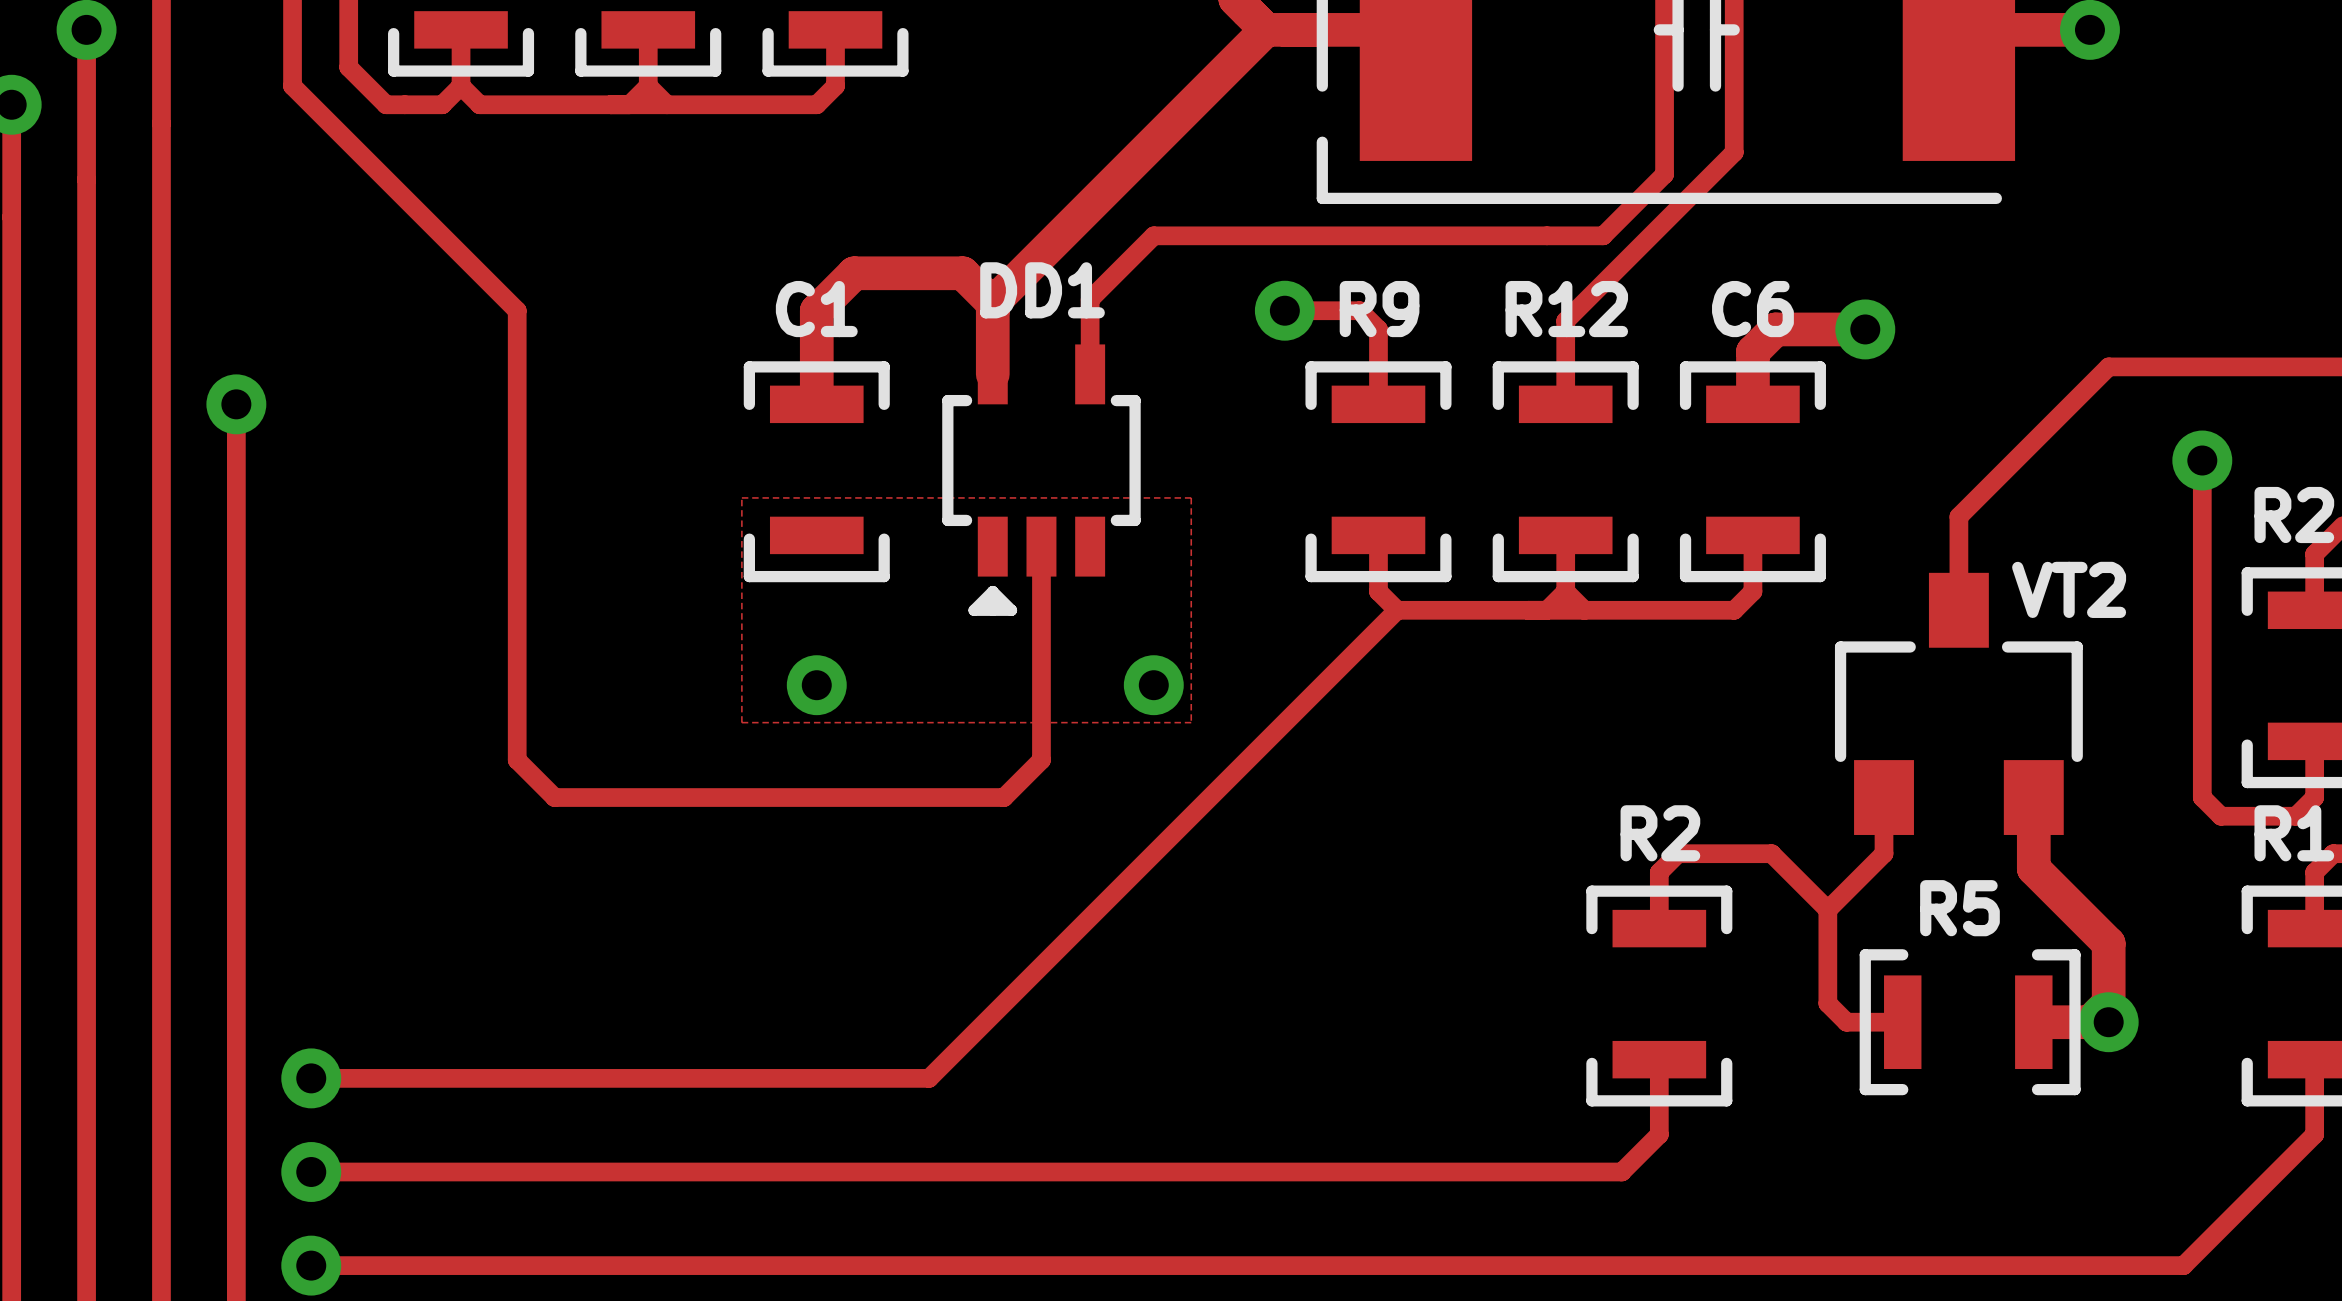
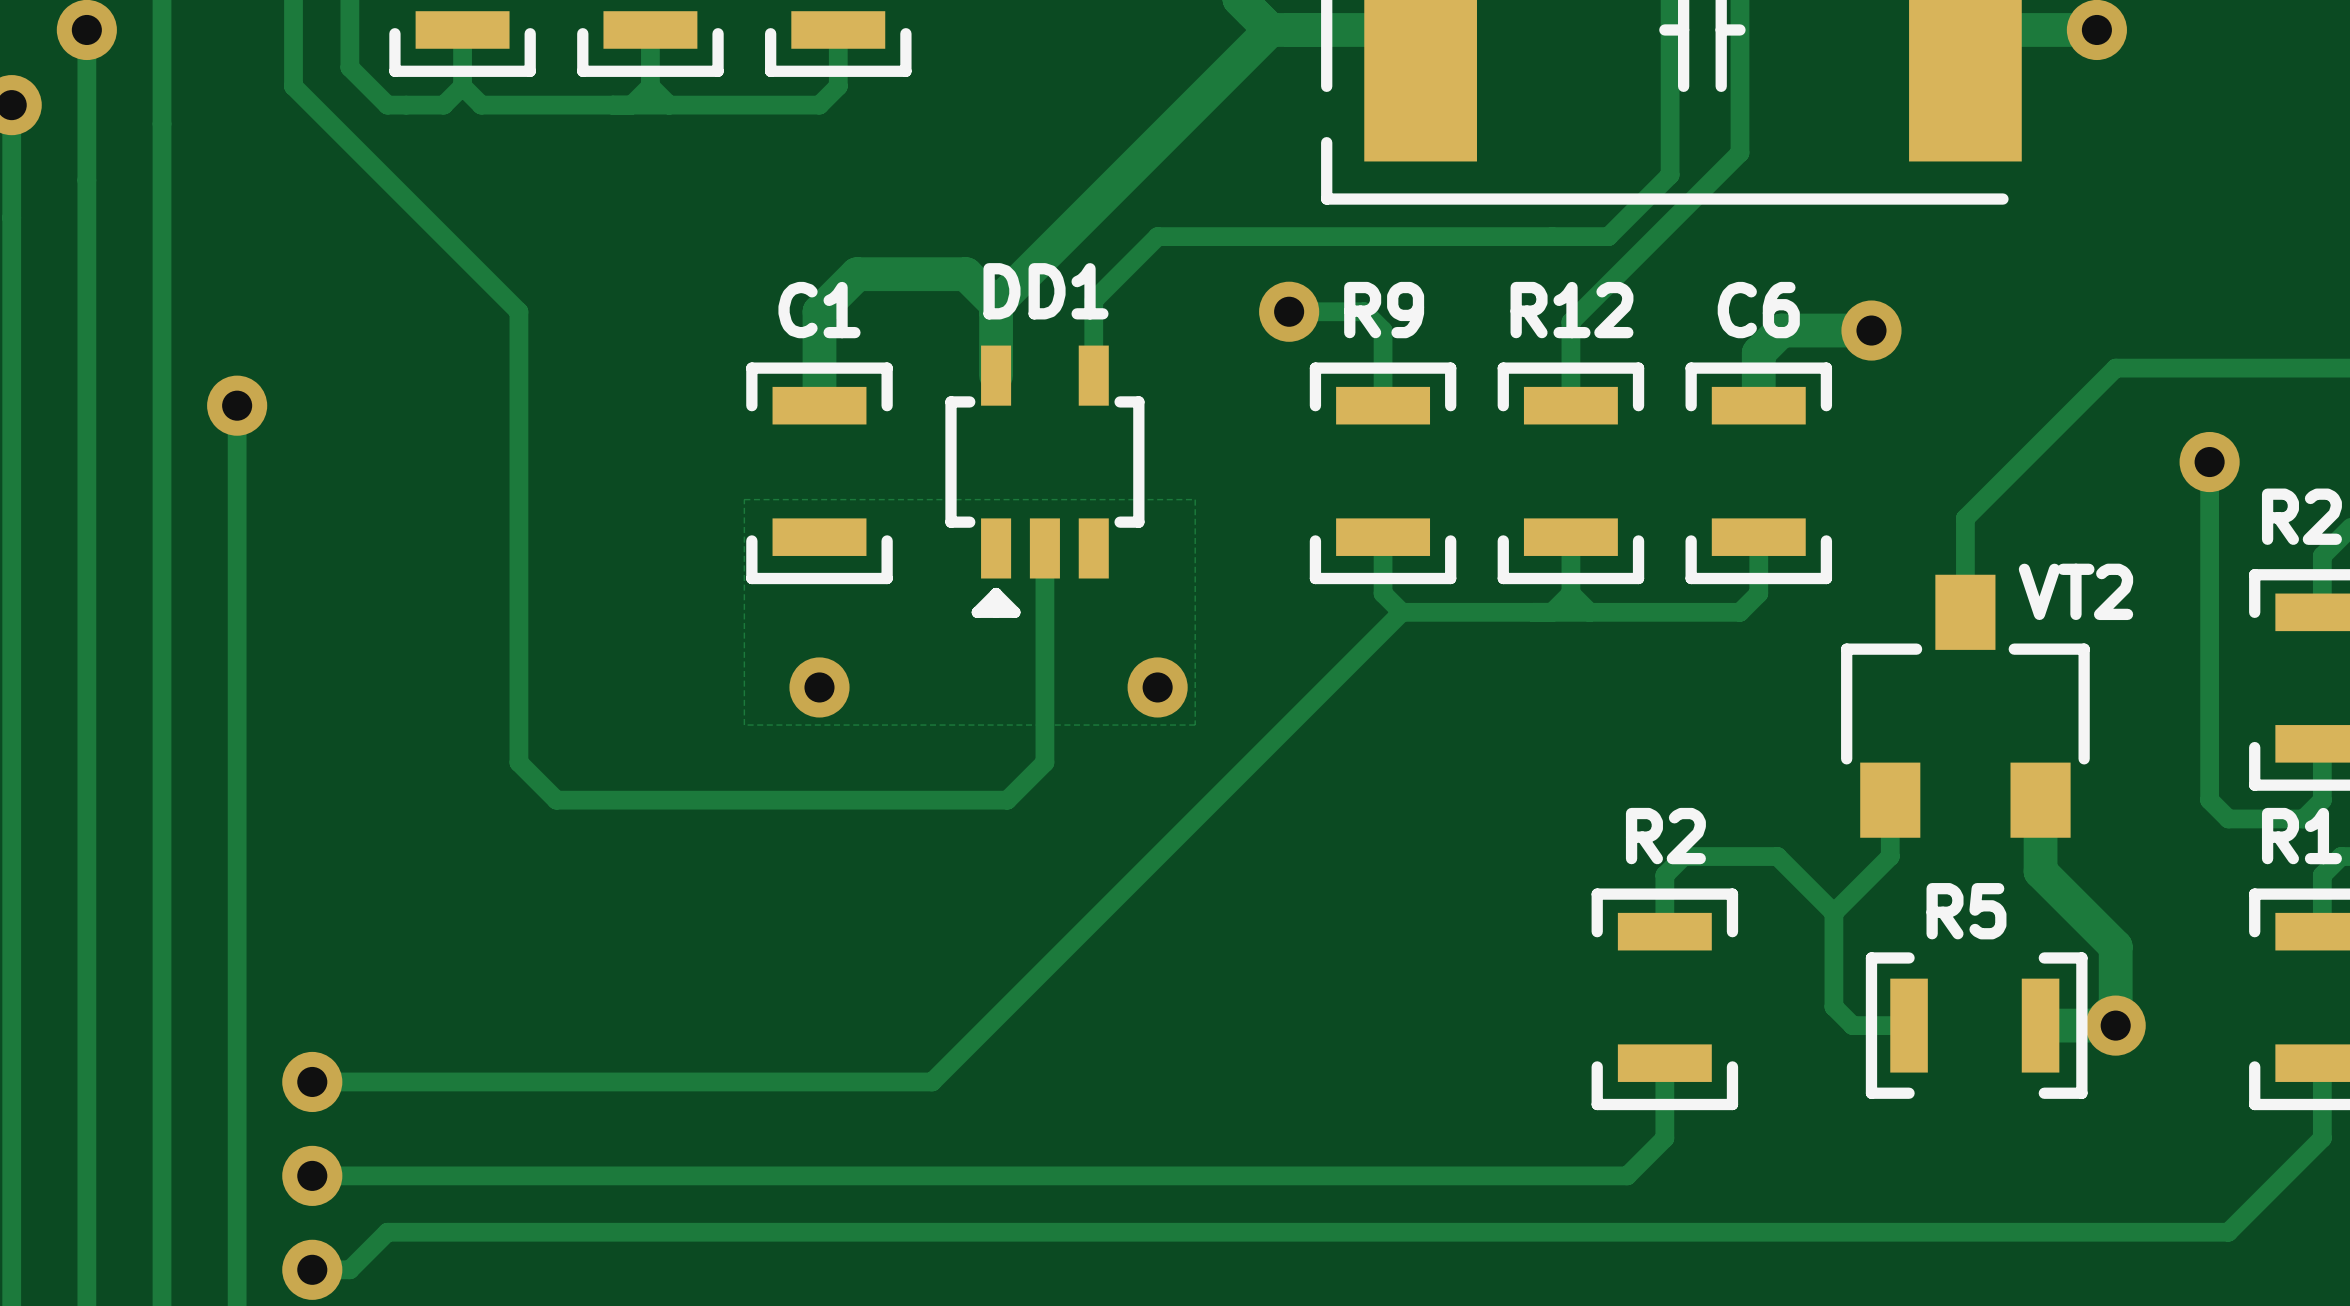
track: (2221, 1228) (2183, 1265) (348, 1265) -> (2228, 1232) (387, 1232) (349, 1269)

